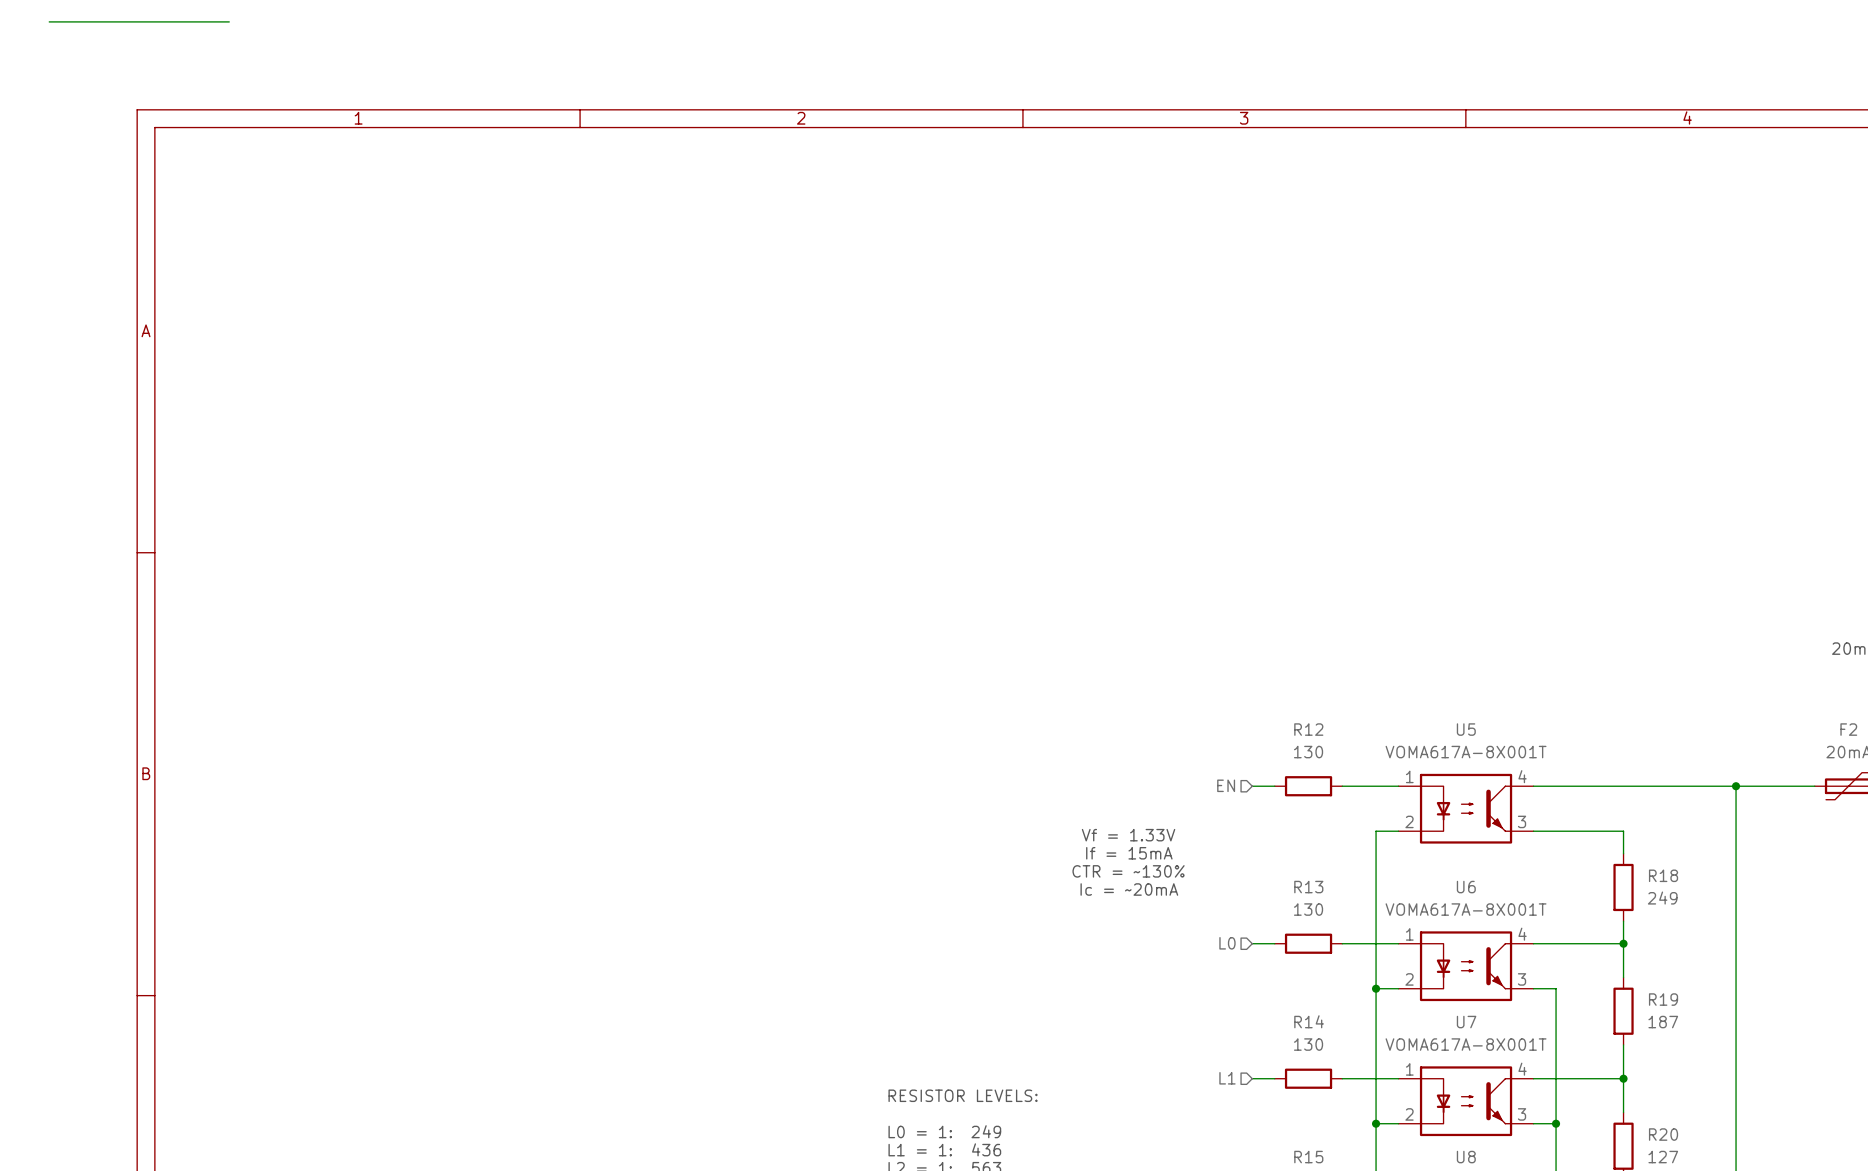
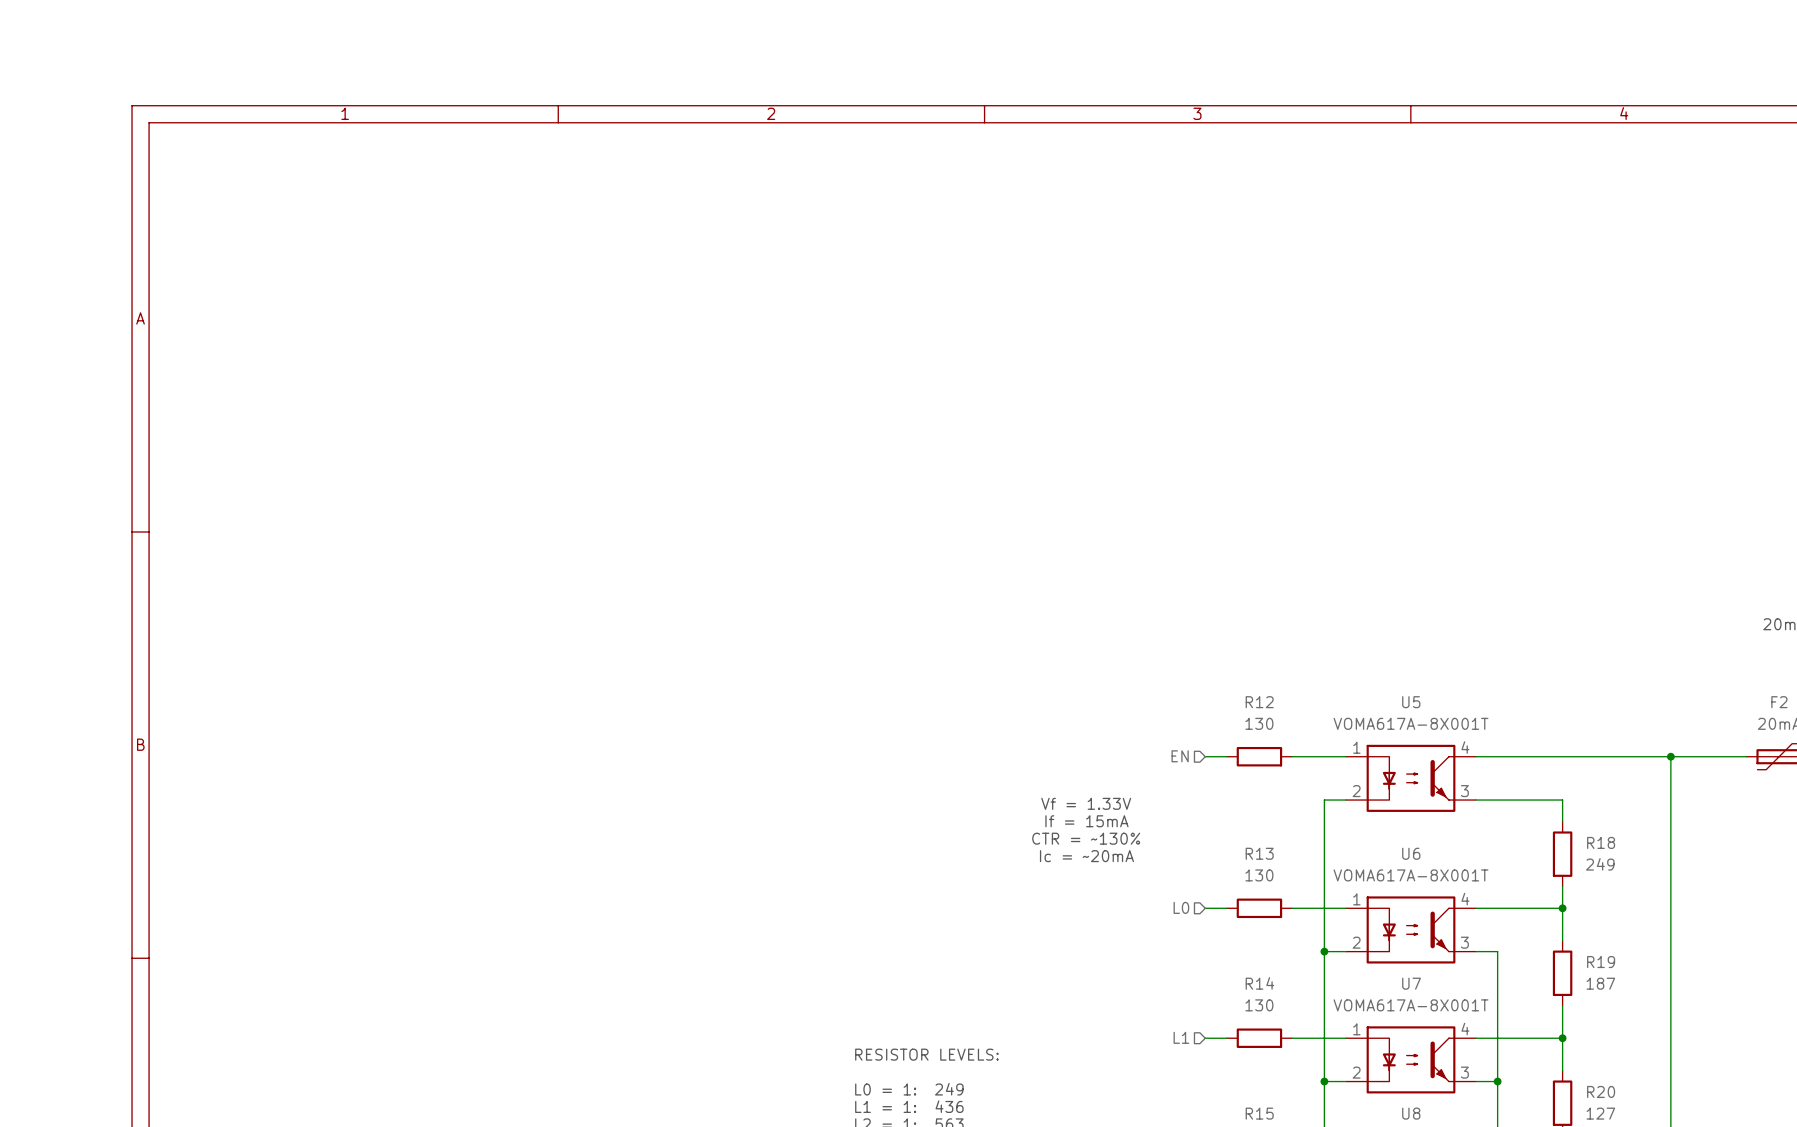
wire: (49, 21) (229, 21) -> none

